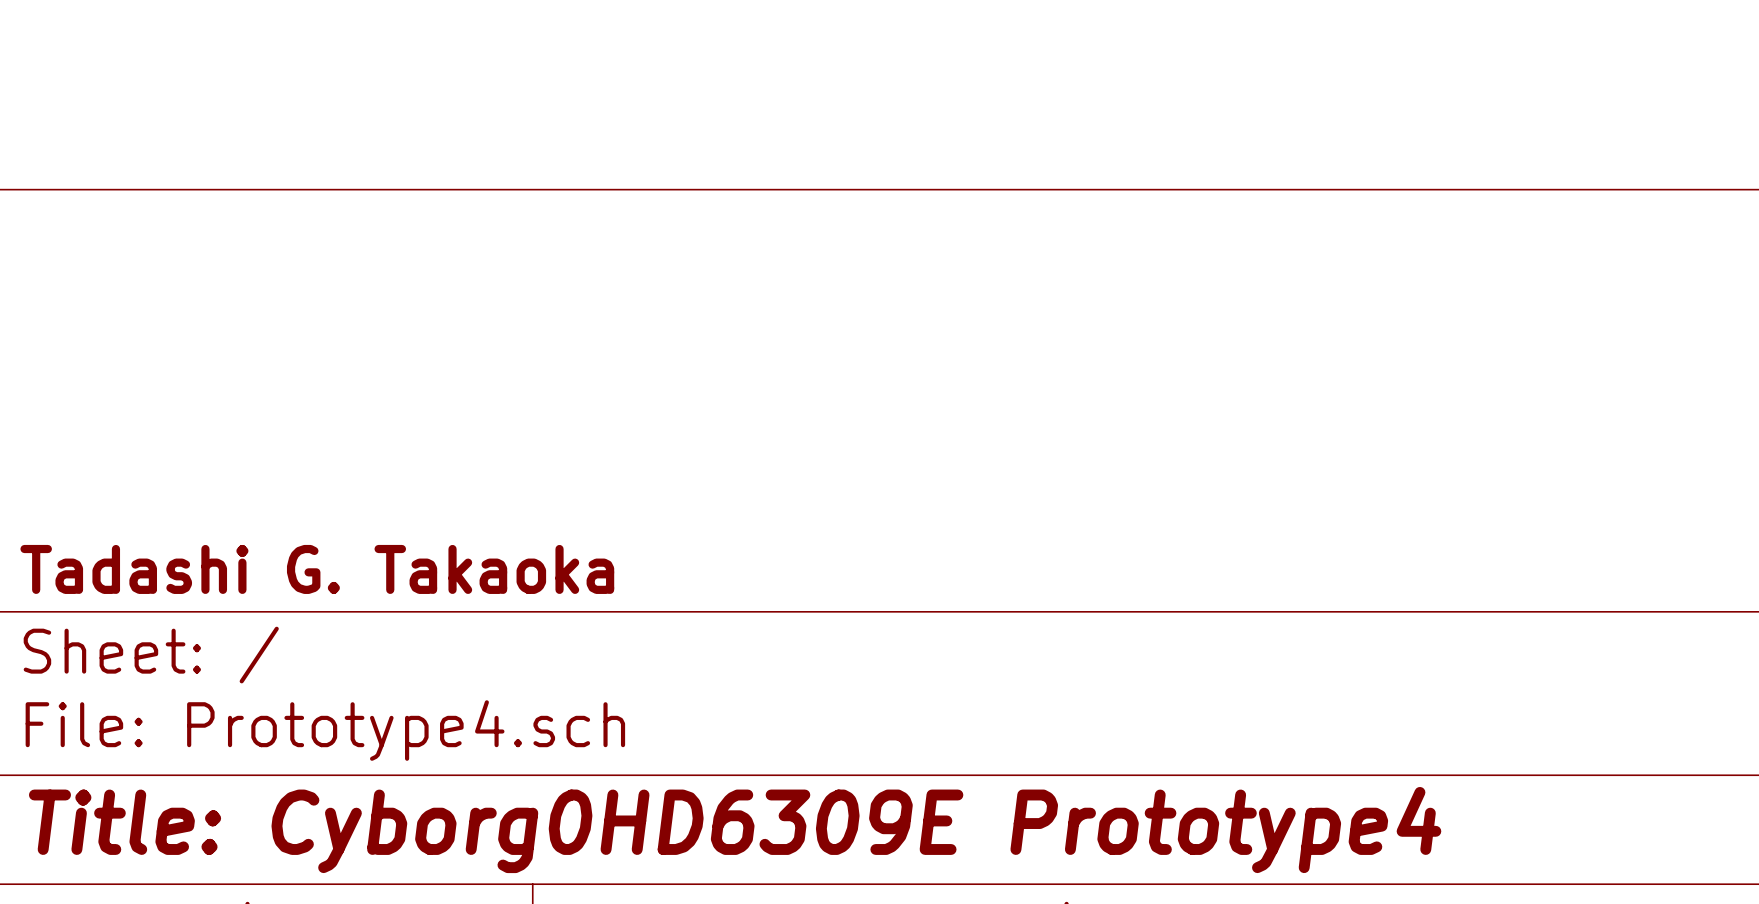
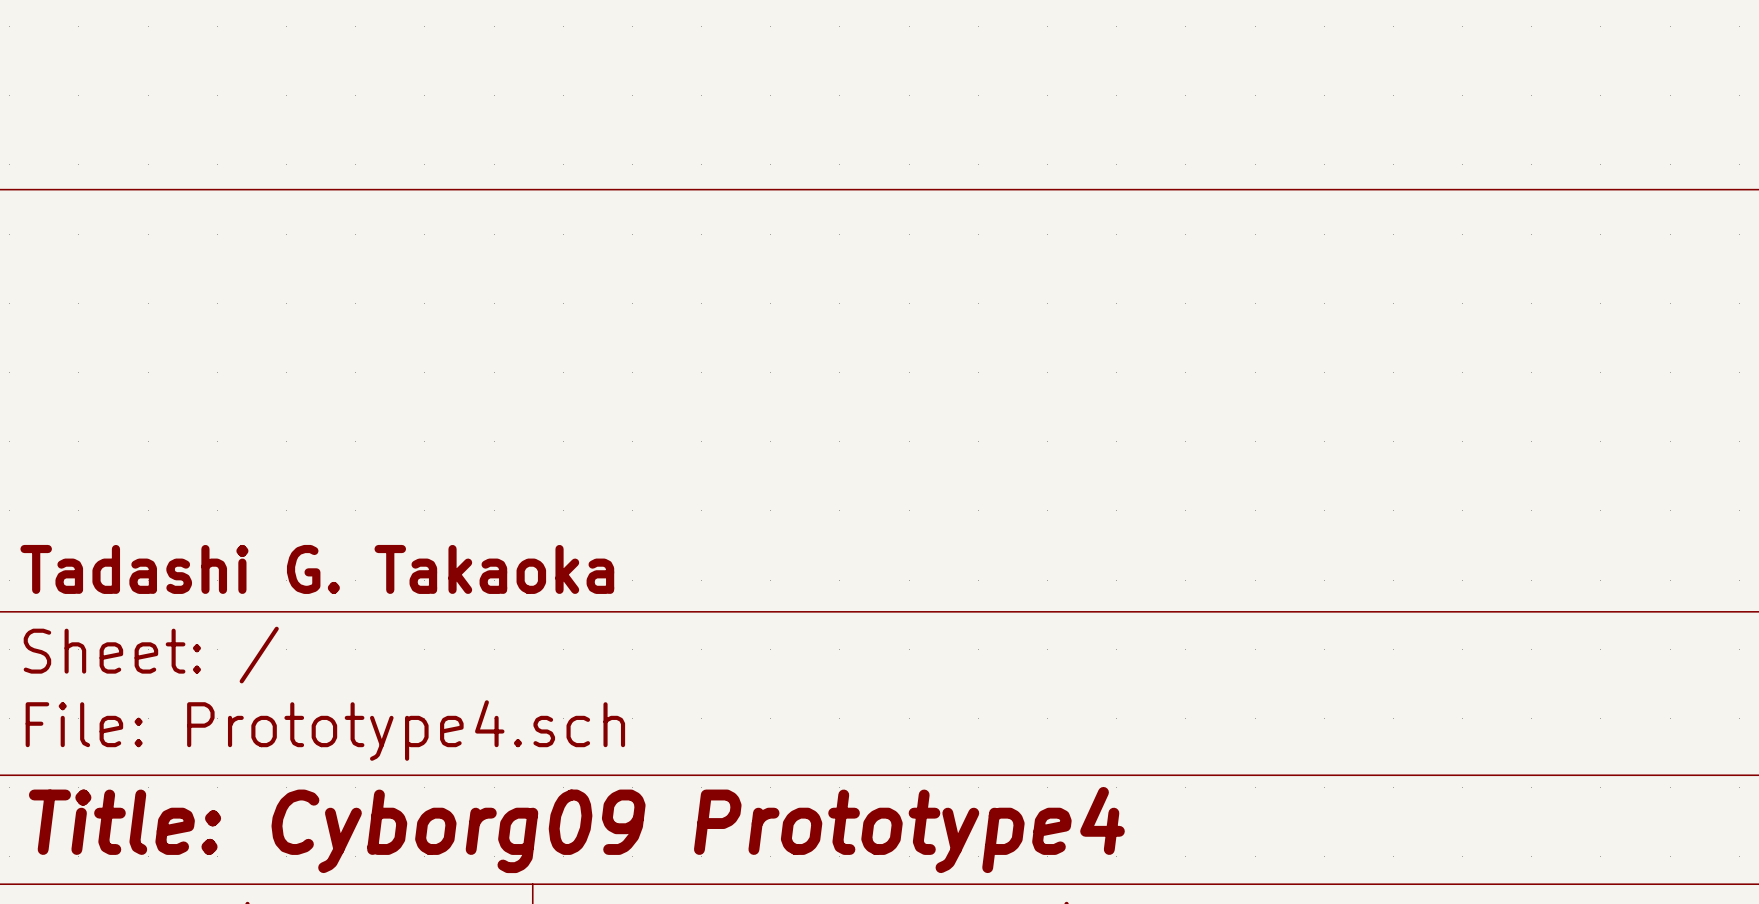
title block: Title: Cyborg0HD6309E Prototype4 (735, 830) -> Title: Cyborg09 Prototype4 (576, 830)

